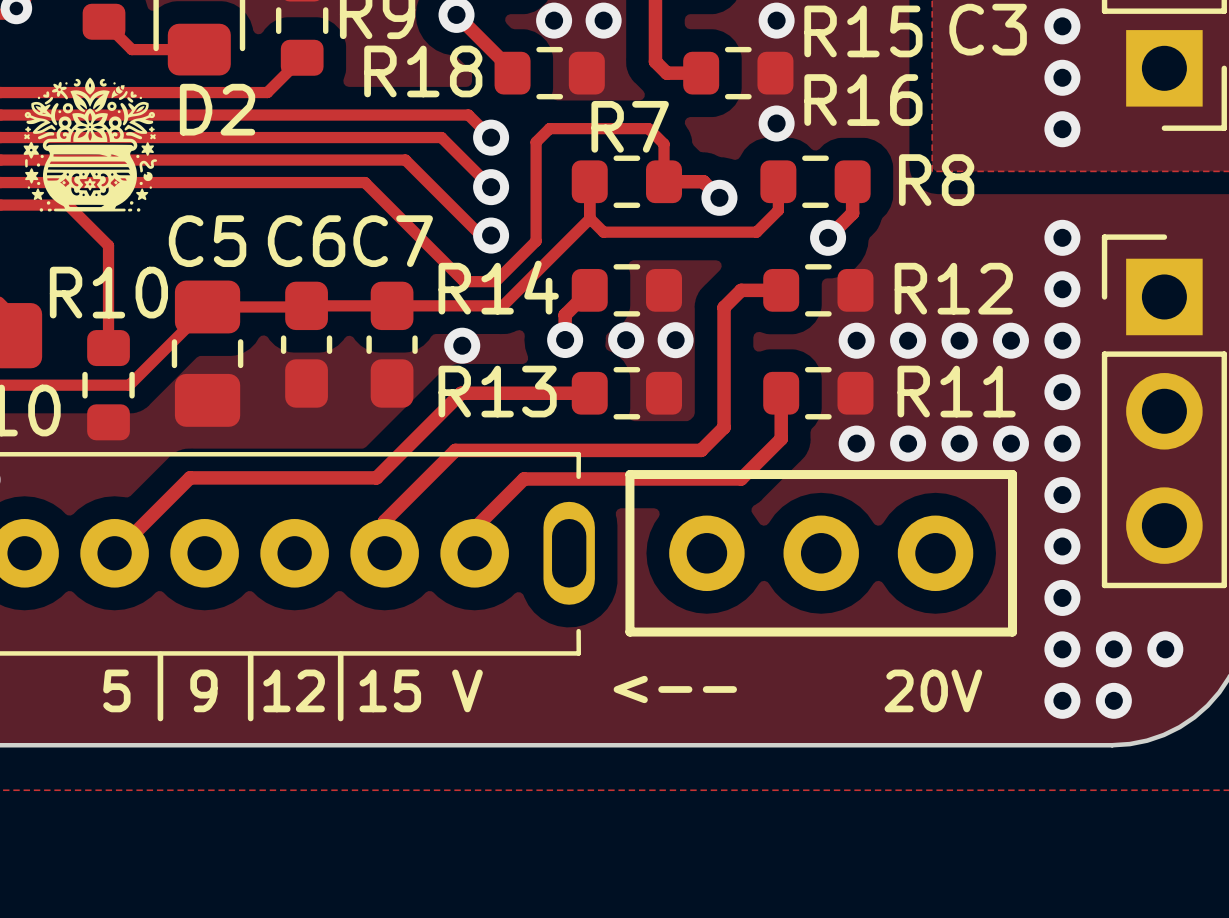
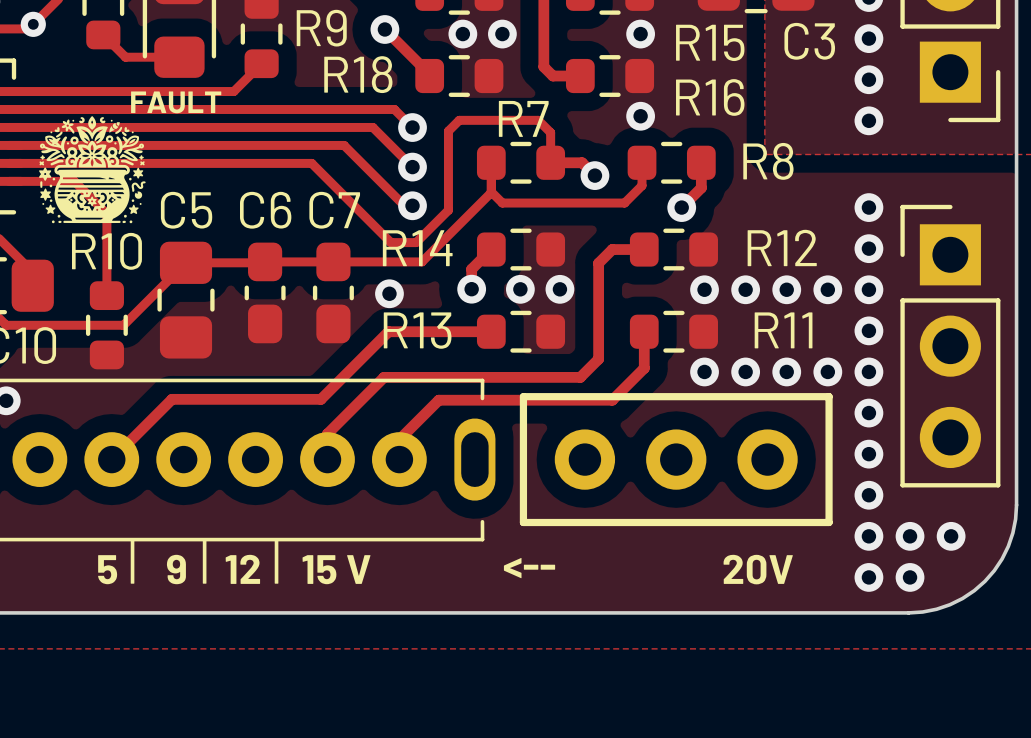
text: none -> FAULT (176, 102)
D2 name: D2 (217, 109) -> none
drawing position: (90, 144) -> (92, 169)

